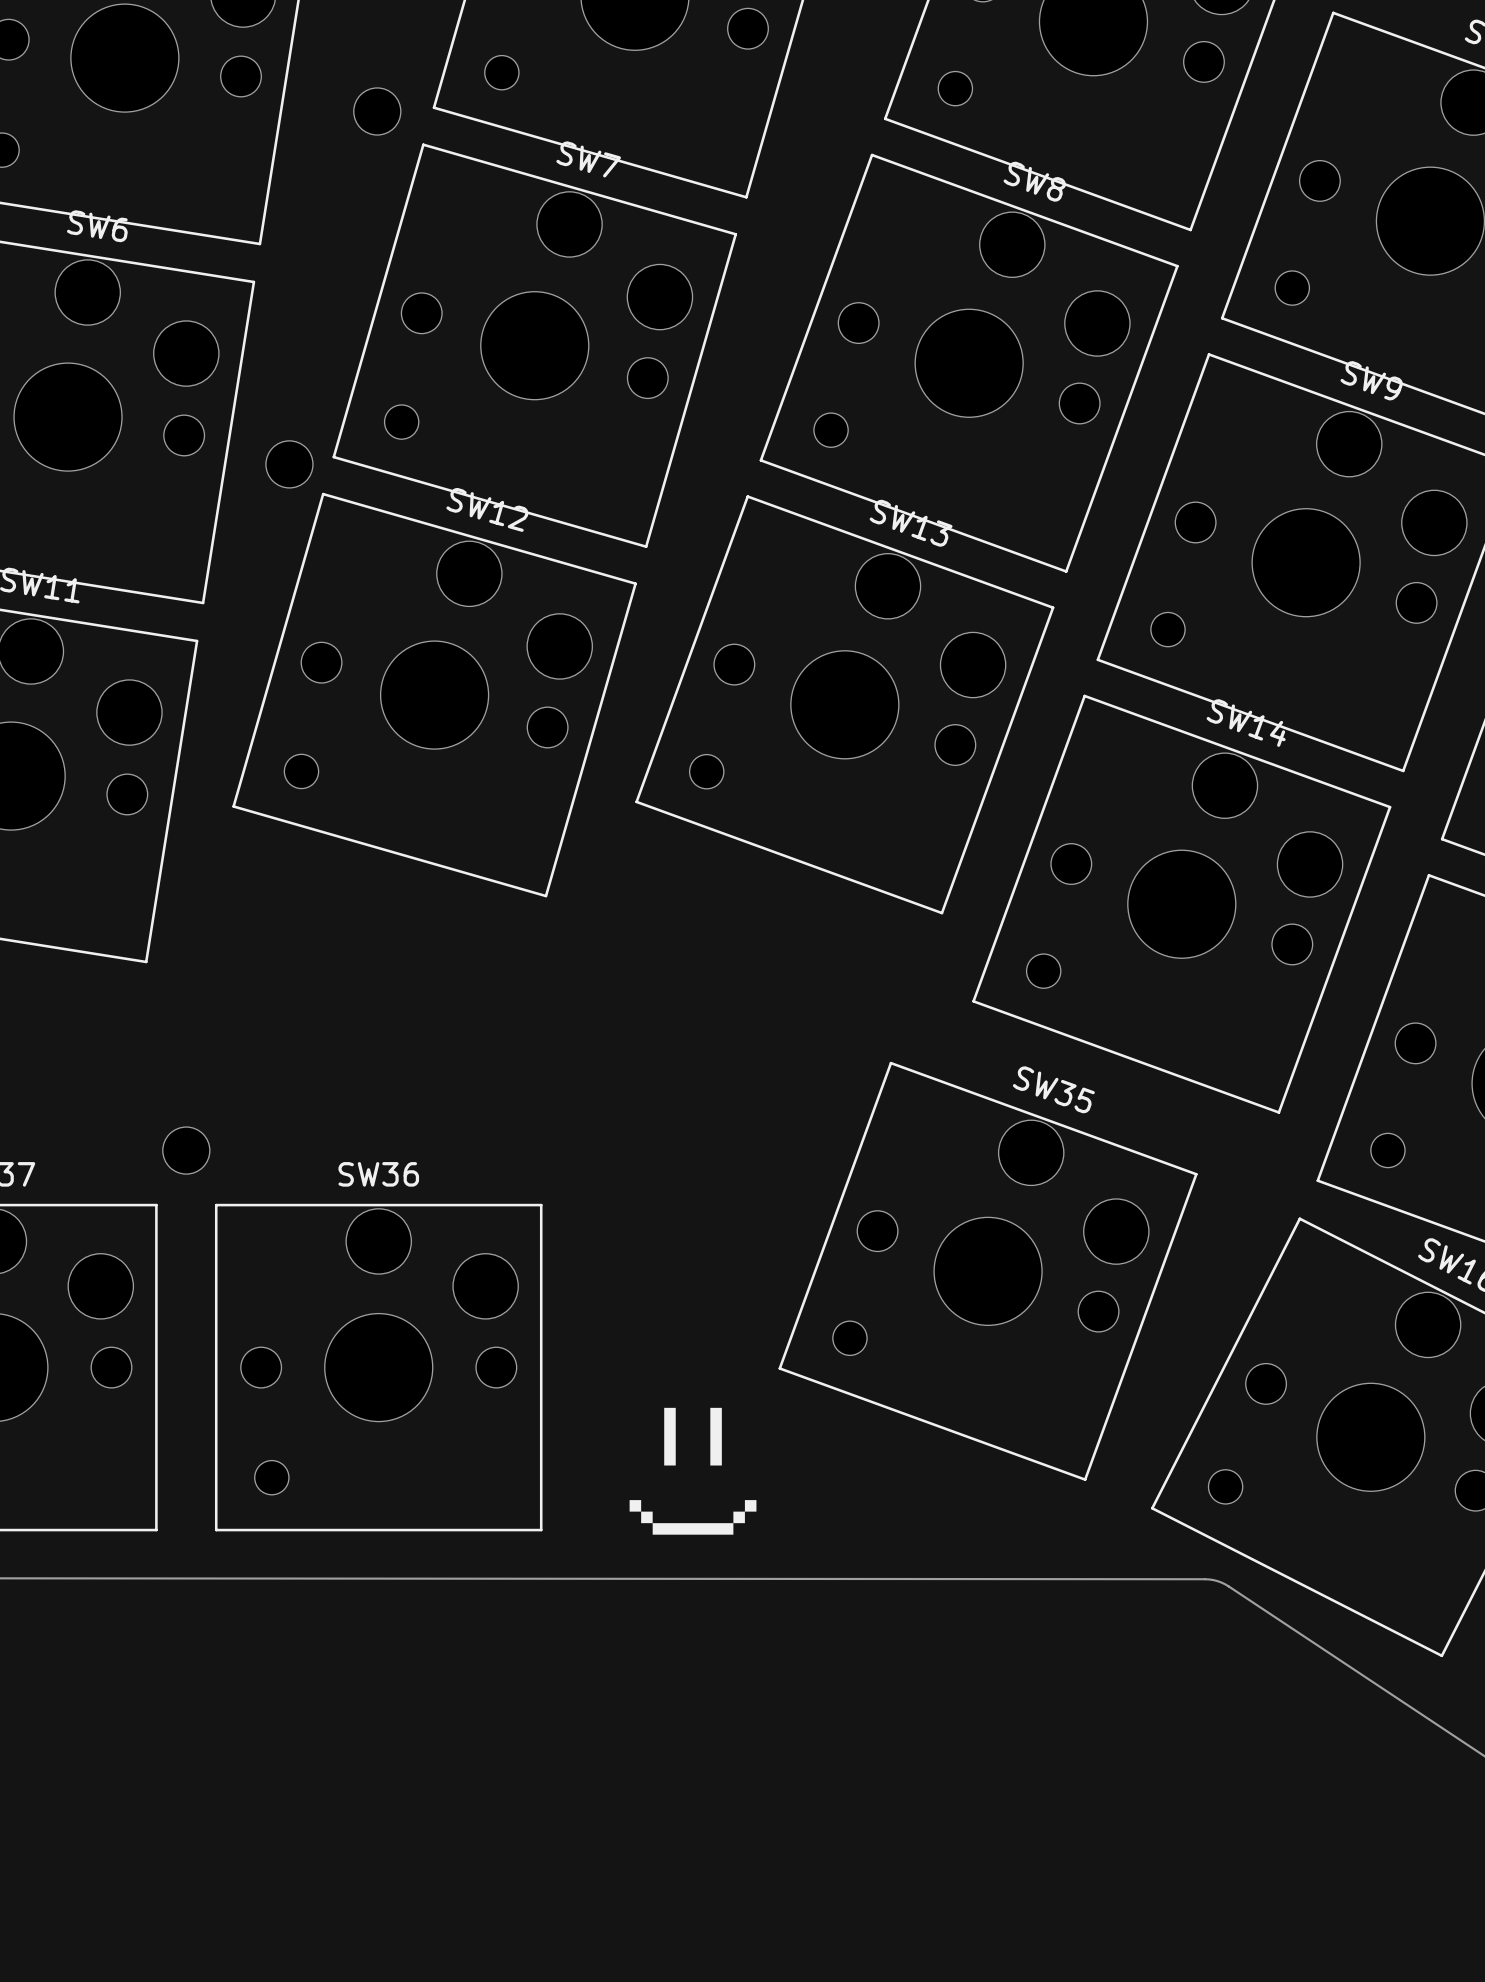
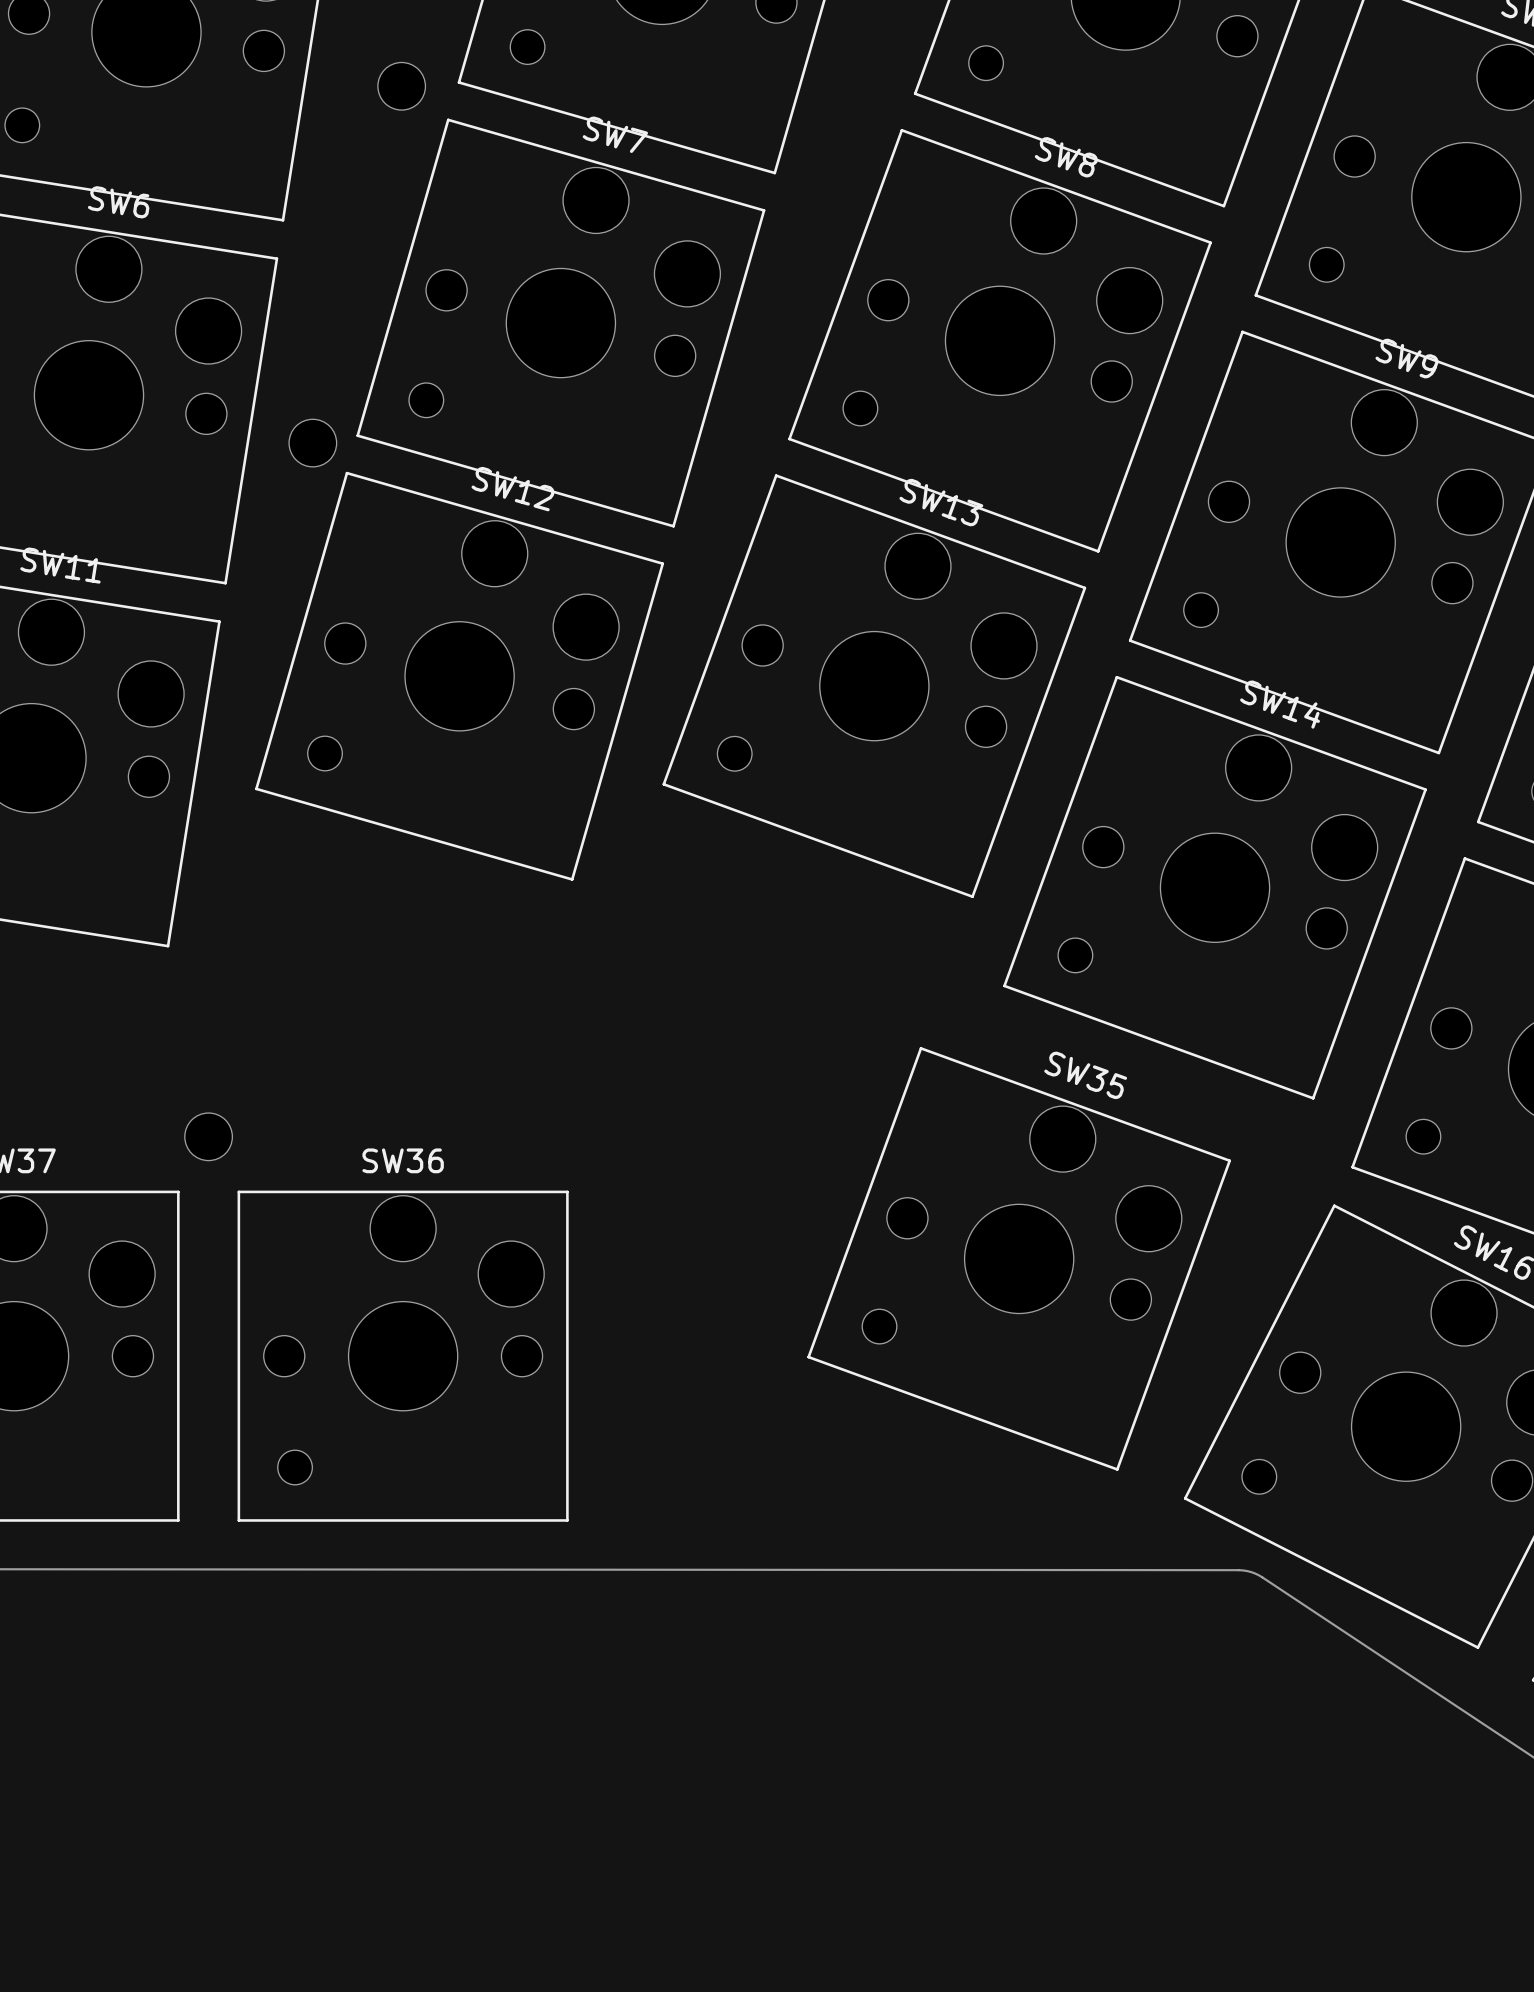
drawing: [629, 1407, 757, 1535] -> none

